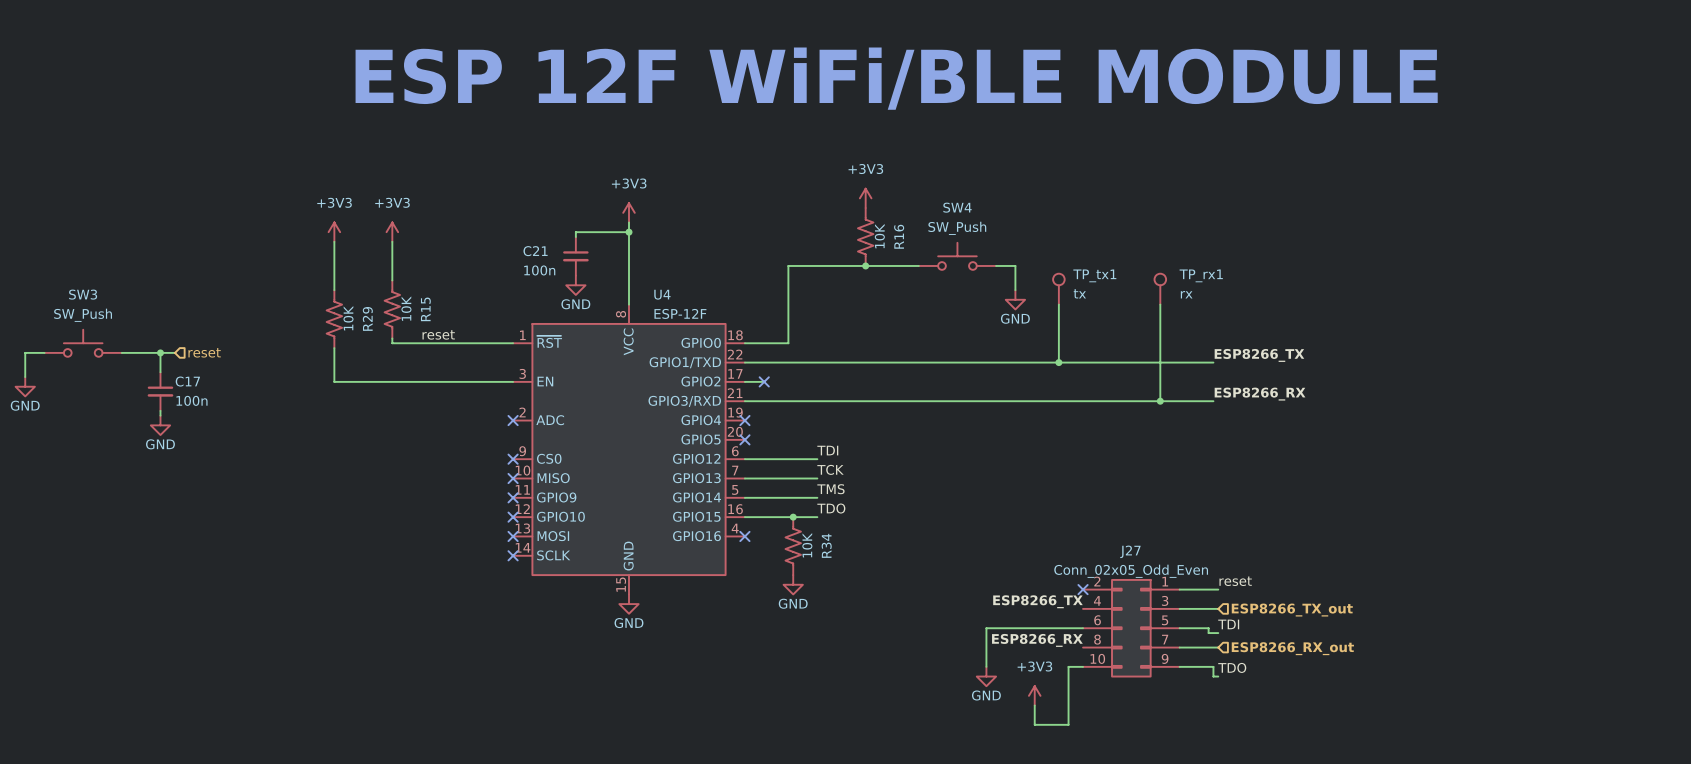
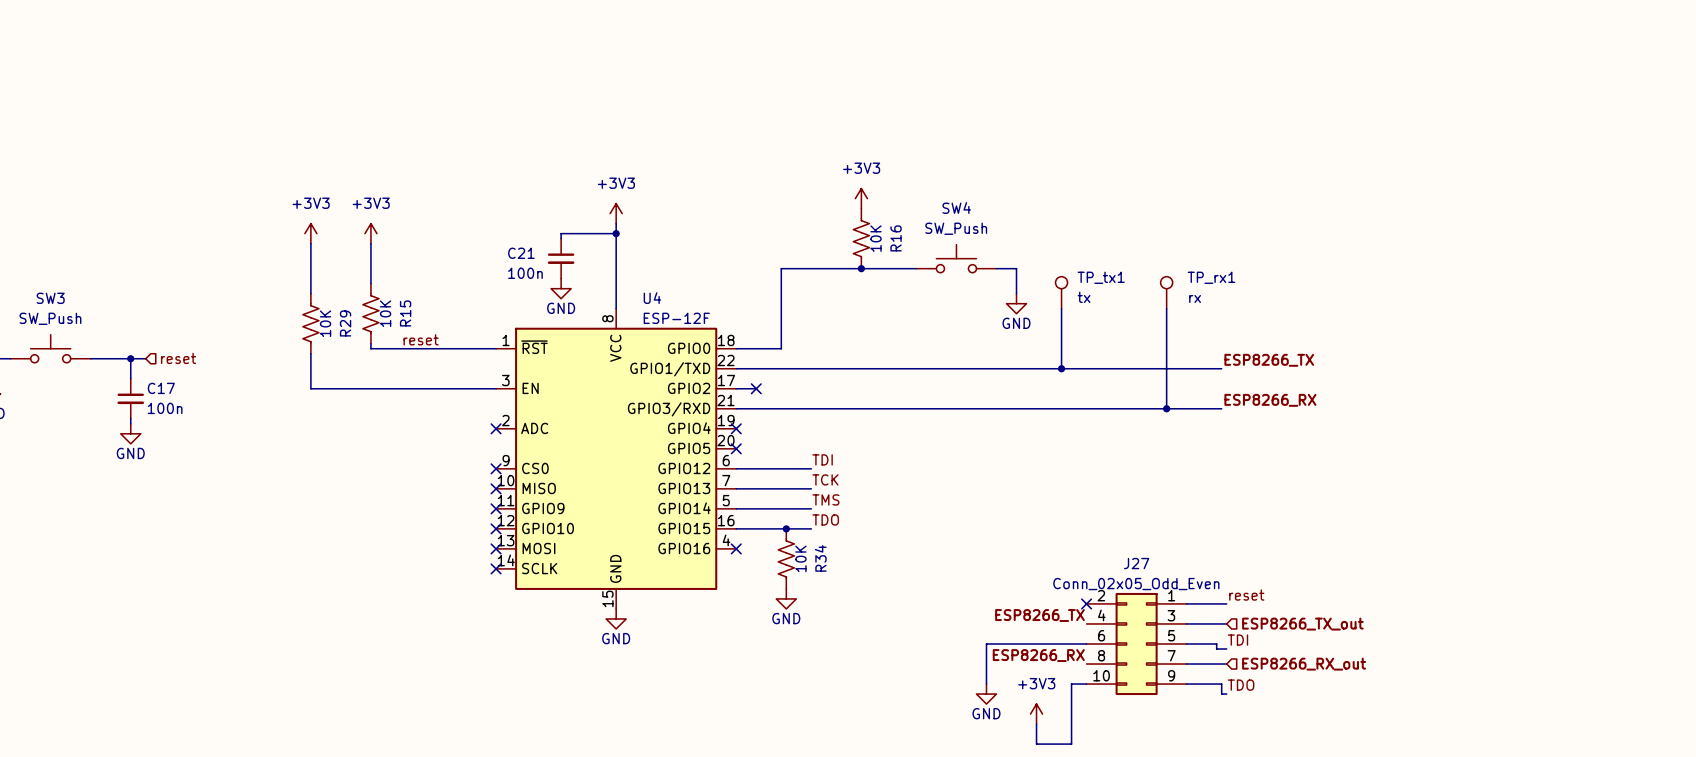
text: ESP 12F WiFi/BLE MODULE (896, 78) -> none

